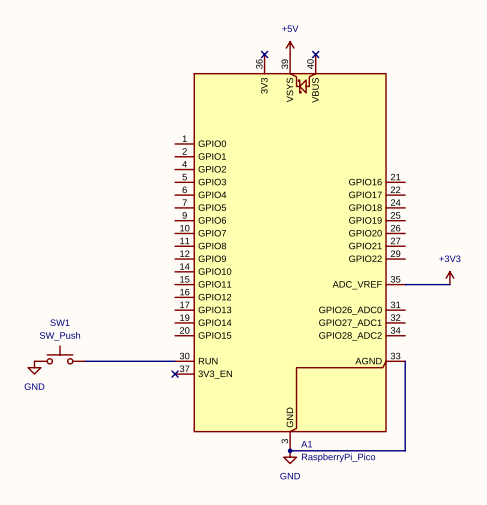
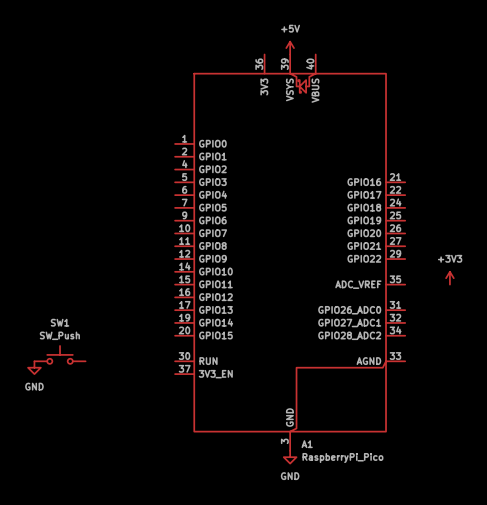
no-connect mark: (264, 54) -> none
no-connect mark: (315, 54) -> none
wire: (405, 284) (449, 284) -> none
wire: (85, 361) (175, 361) -> none
wire: (405, 361) (405, 450) (290, 450) -> none
no-connect mark: (175, 374) -> none
junction: (290, 450) -> none

